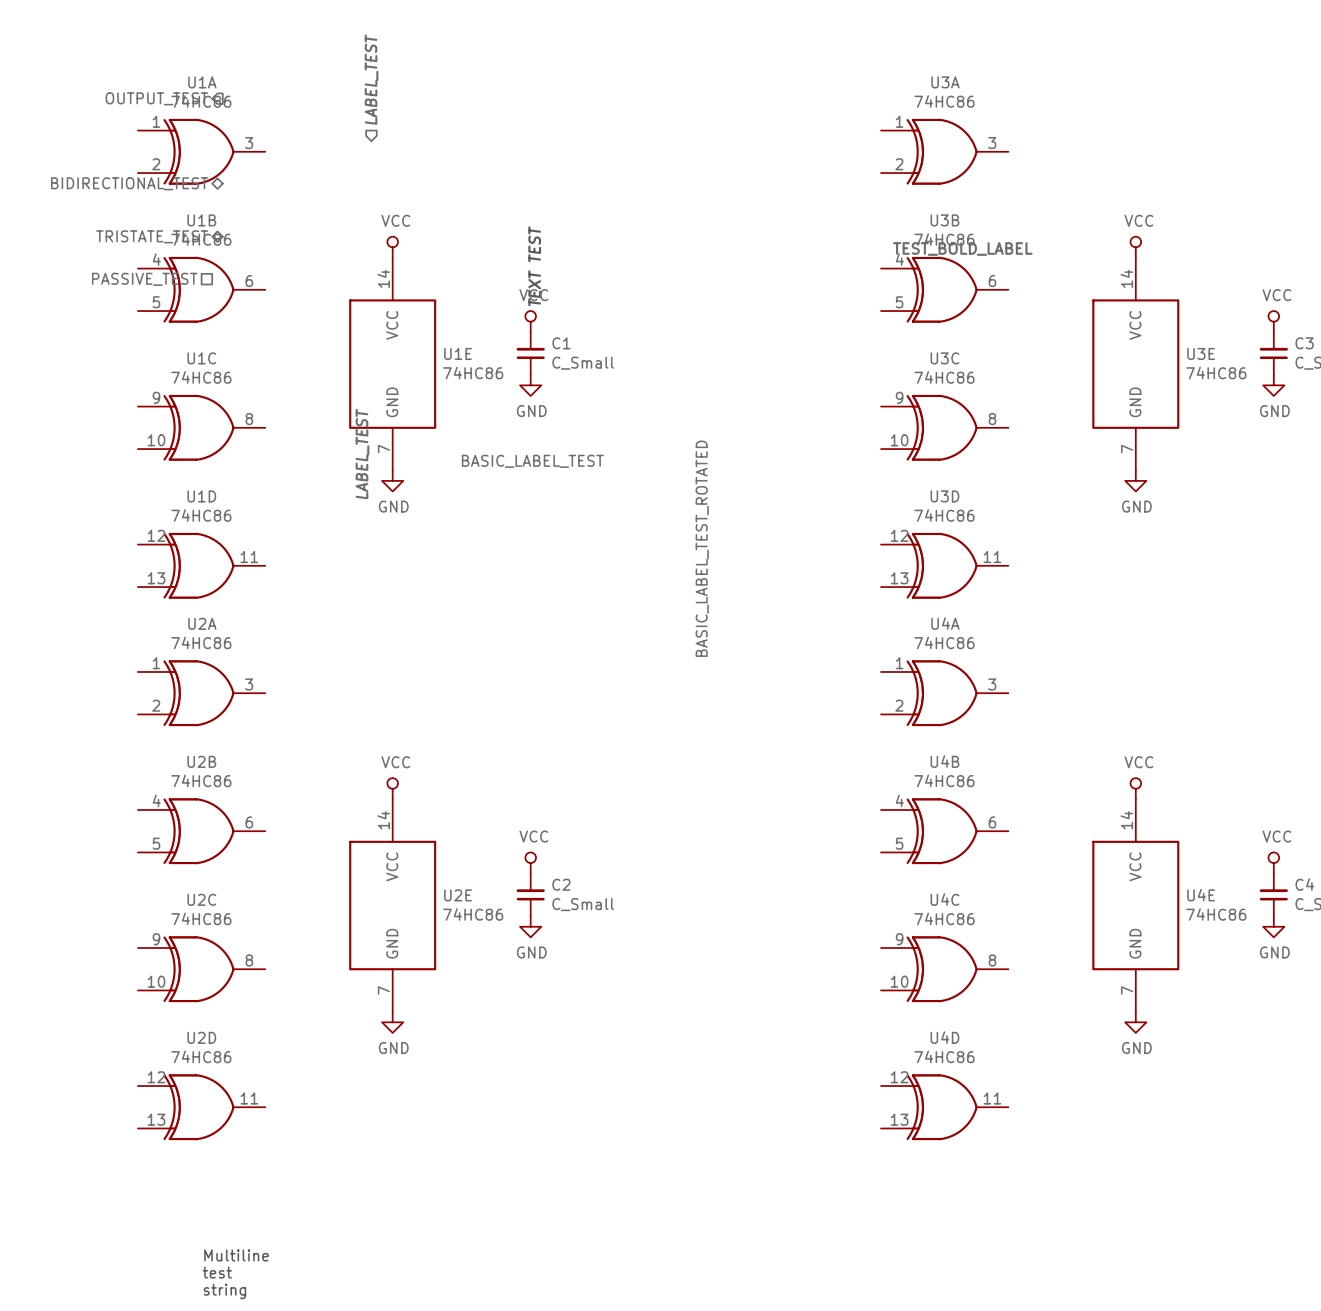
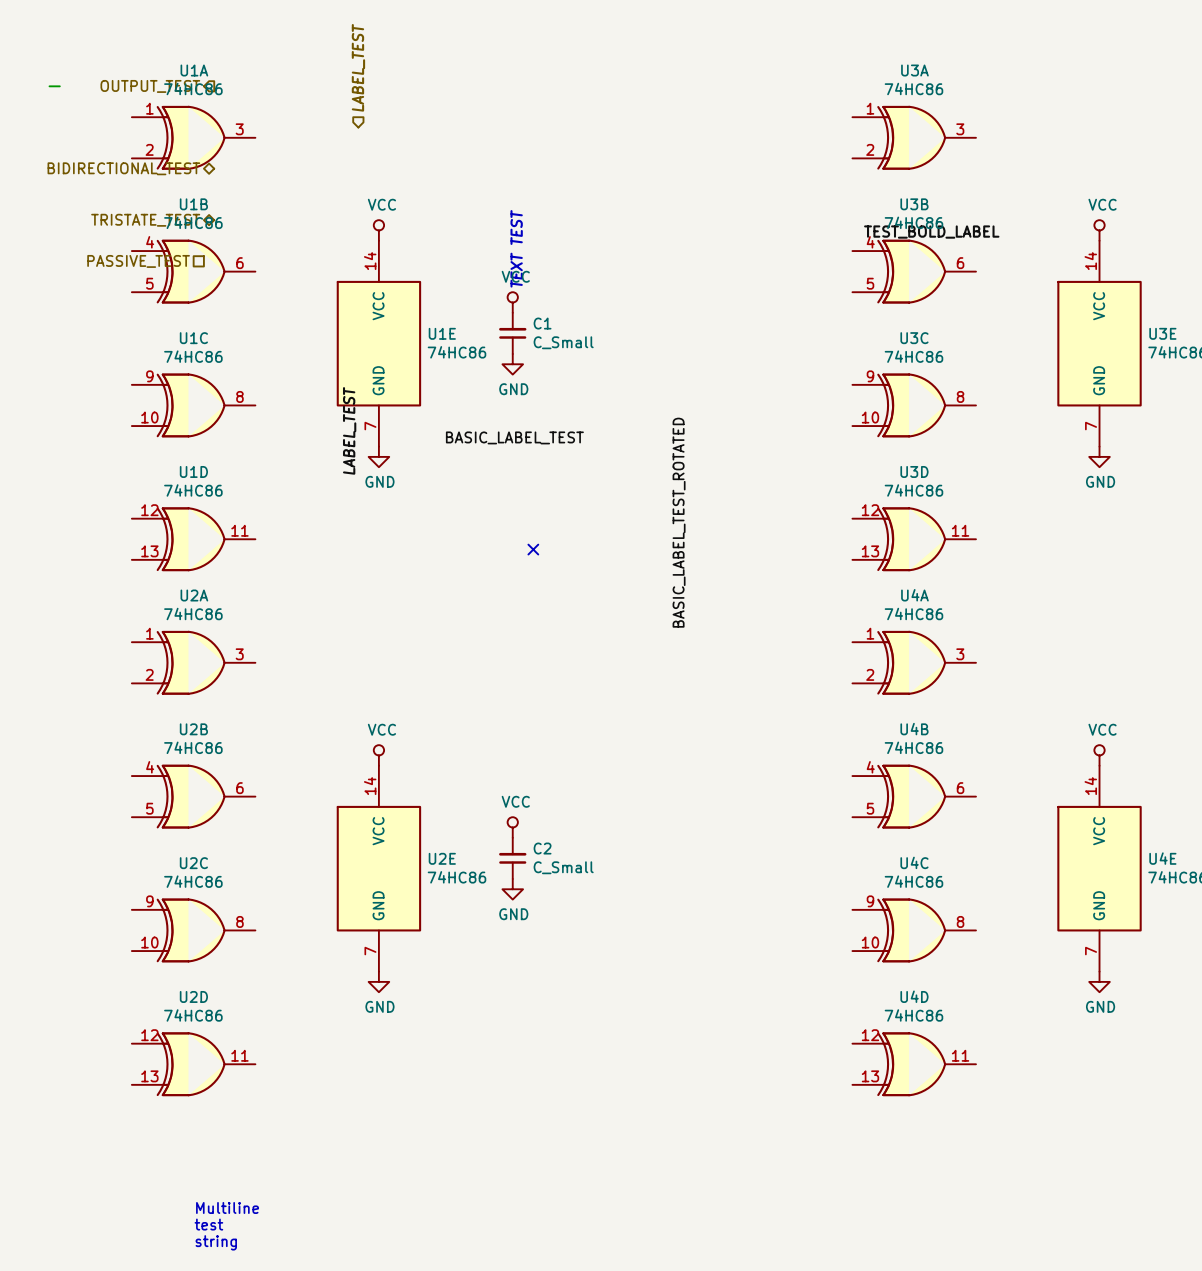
wire: none -> (49, 86) (59, 86)
no-connect mark: none -> (533, 549)

